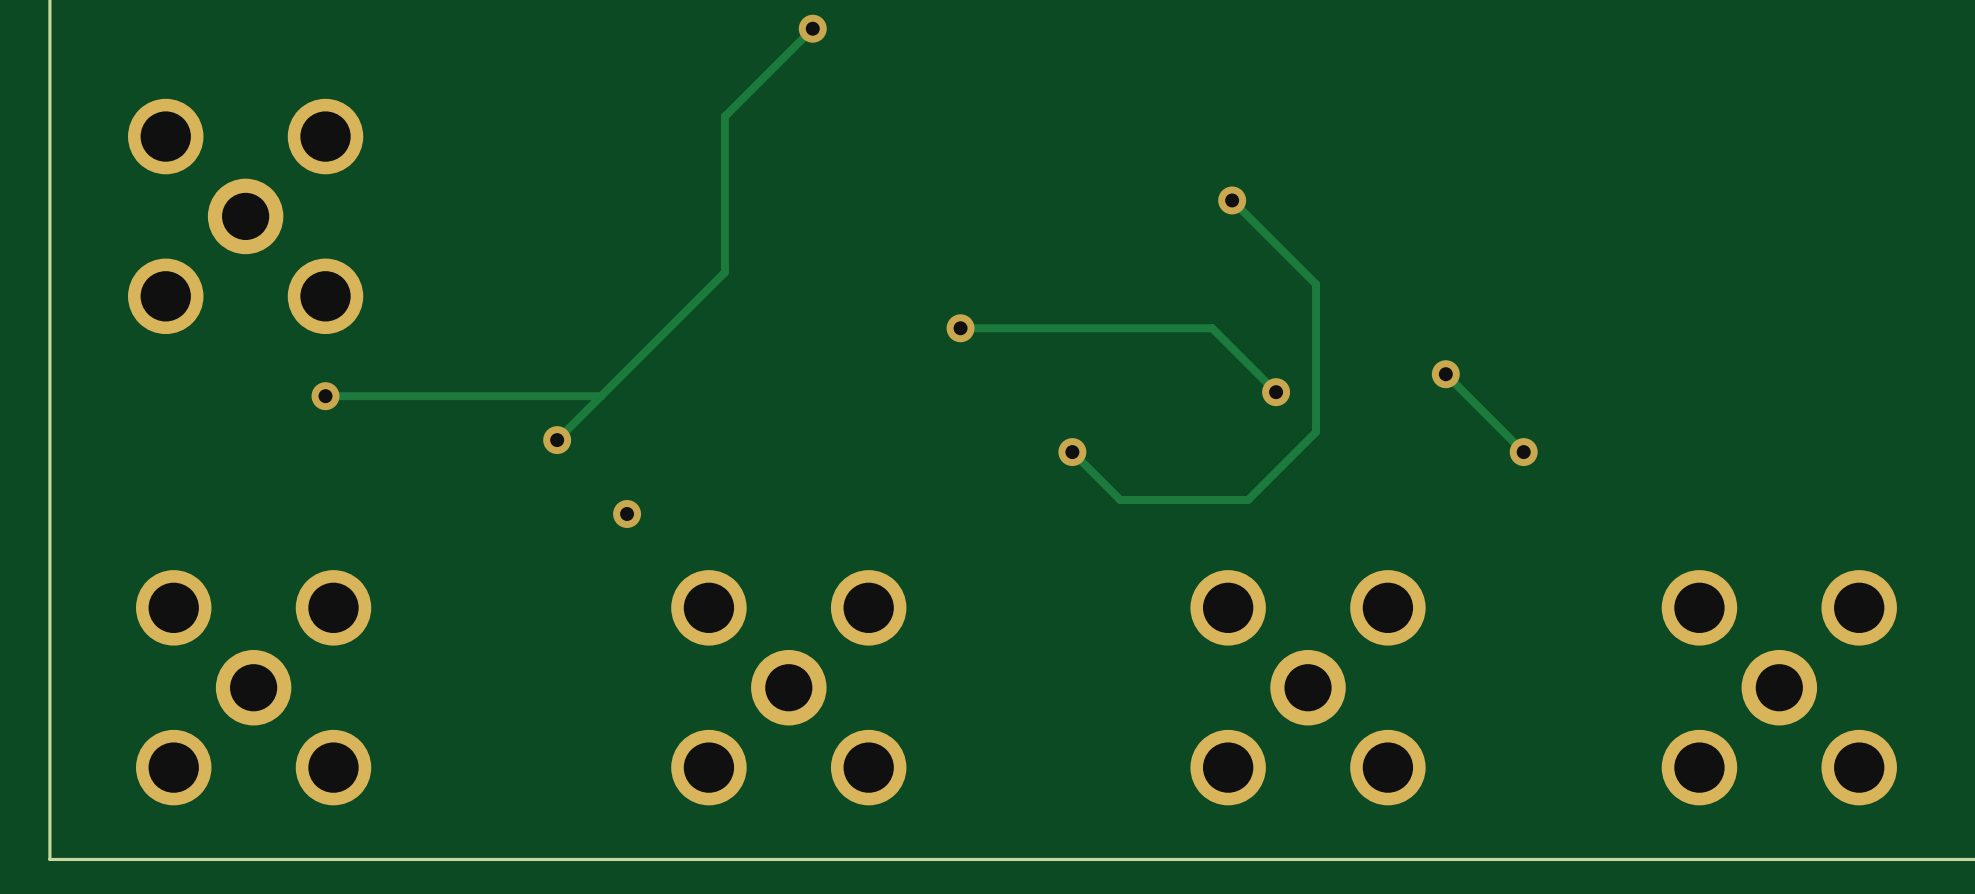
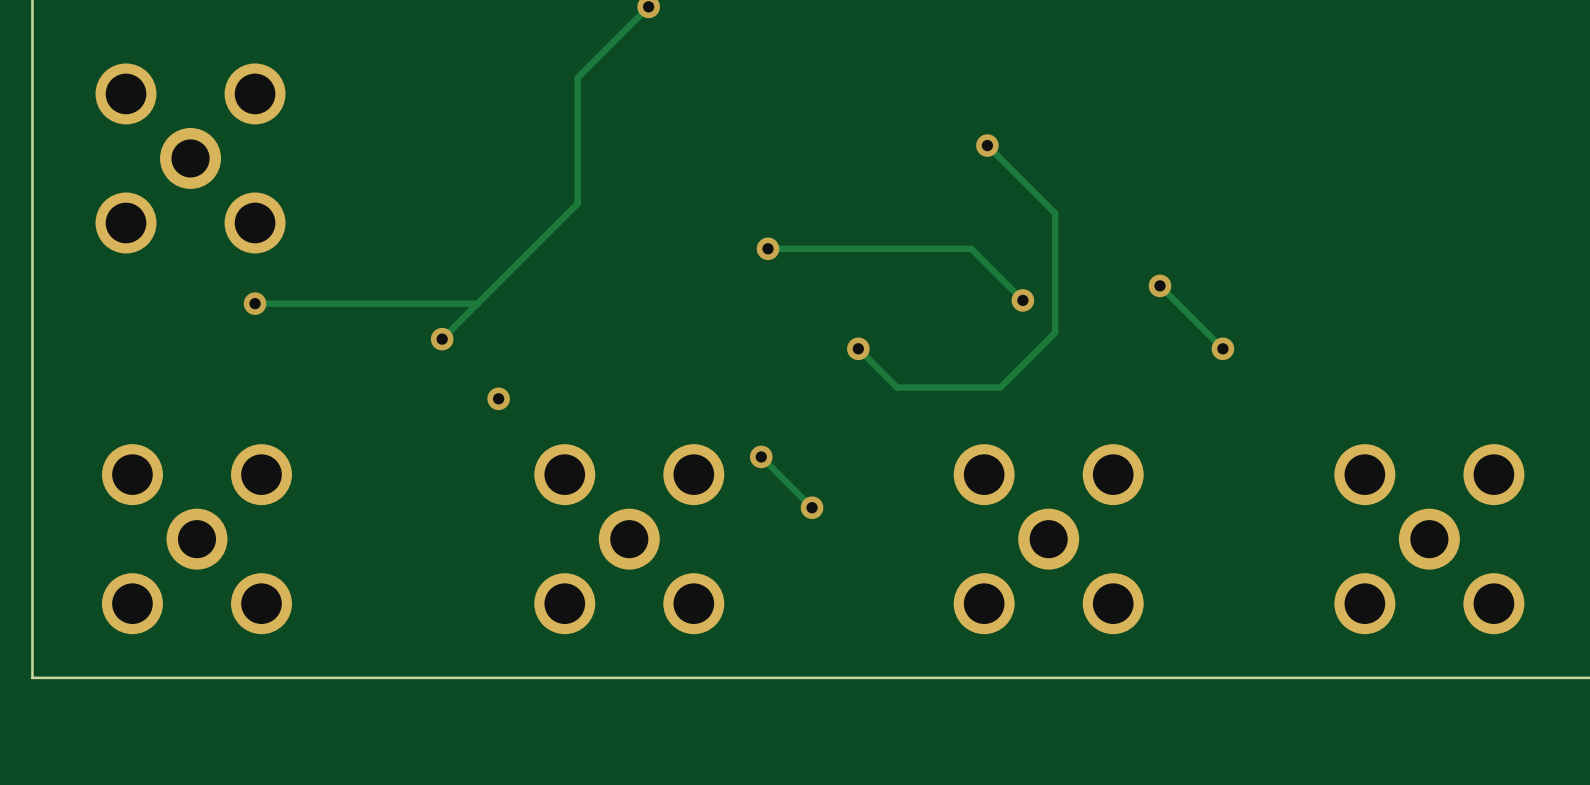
track: none -> (761, 456) (812, 507)
via: none -> (761, 456)
via: none -> (812, 507)

